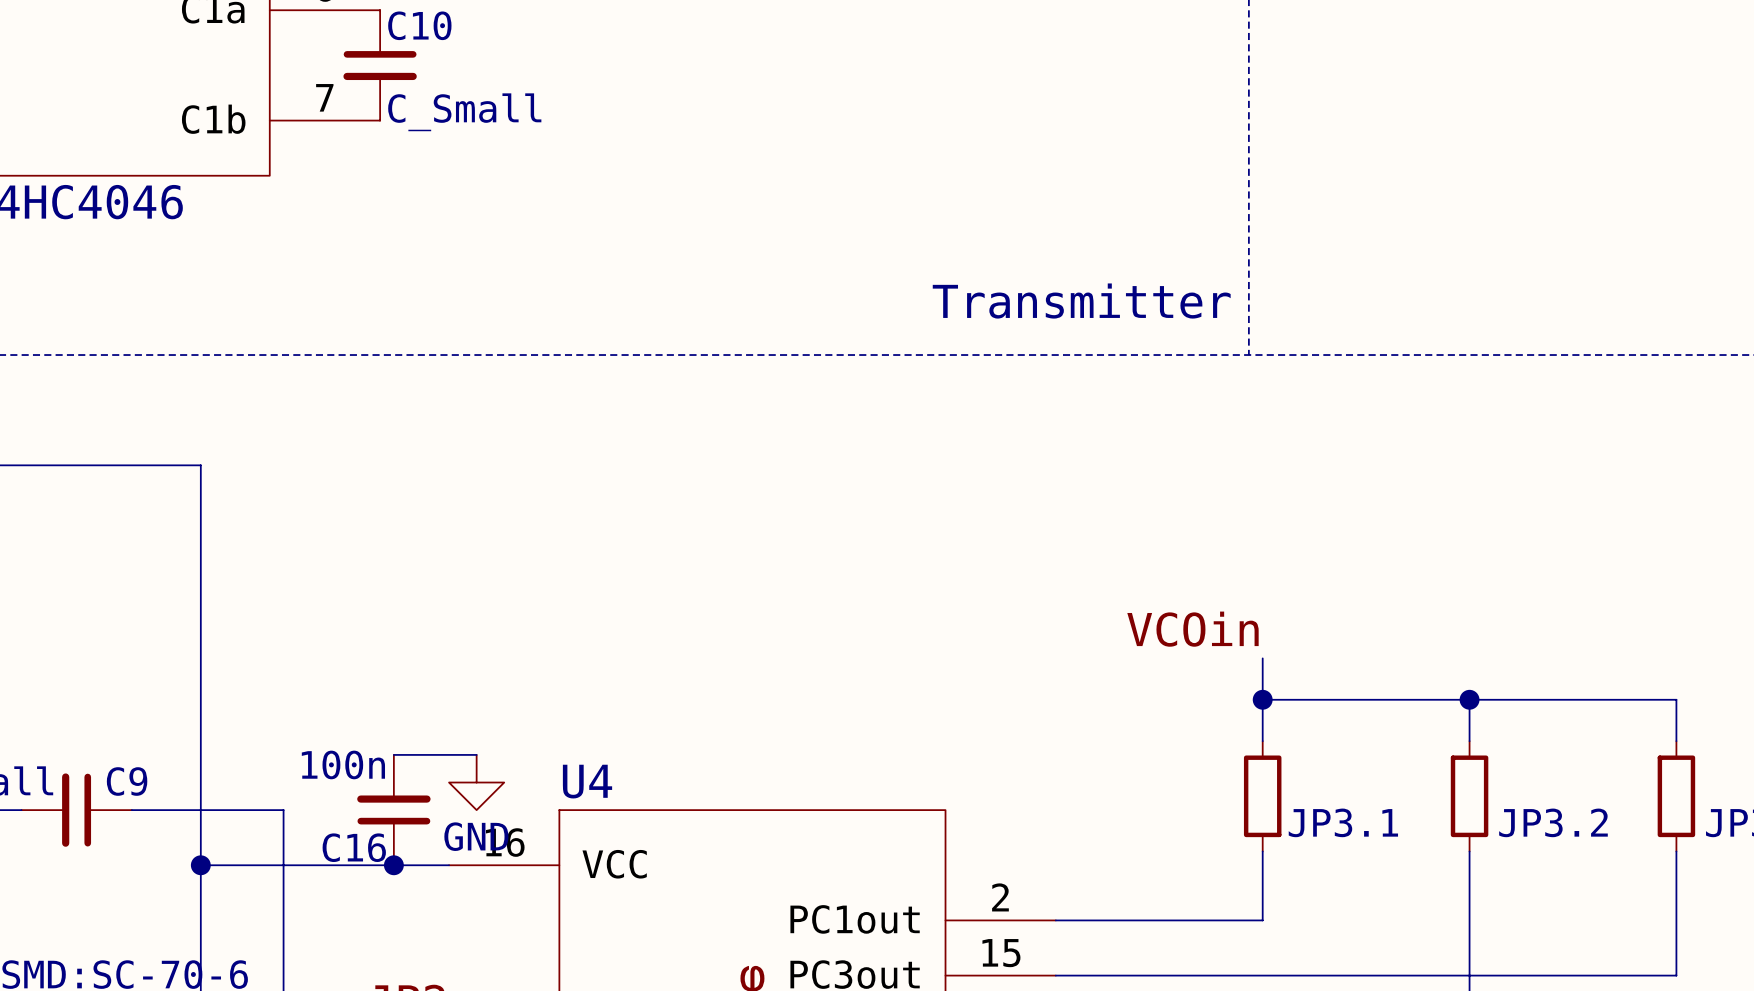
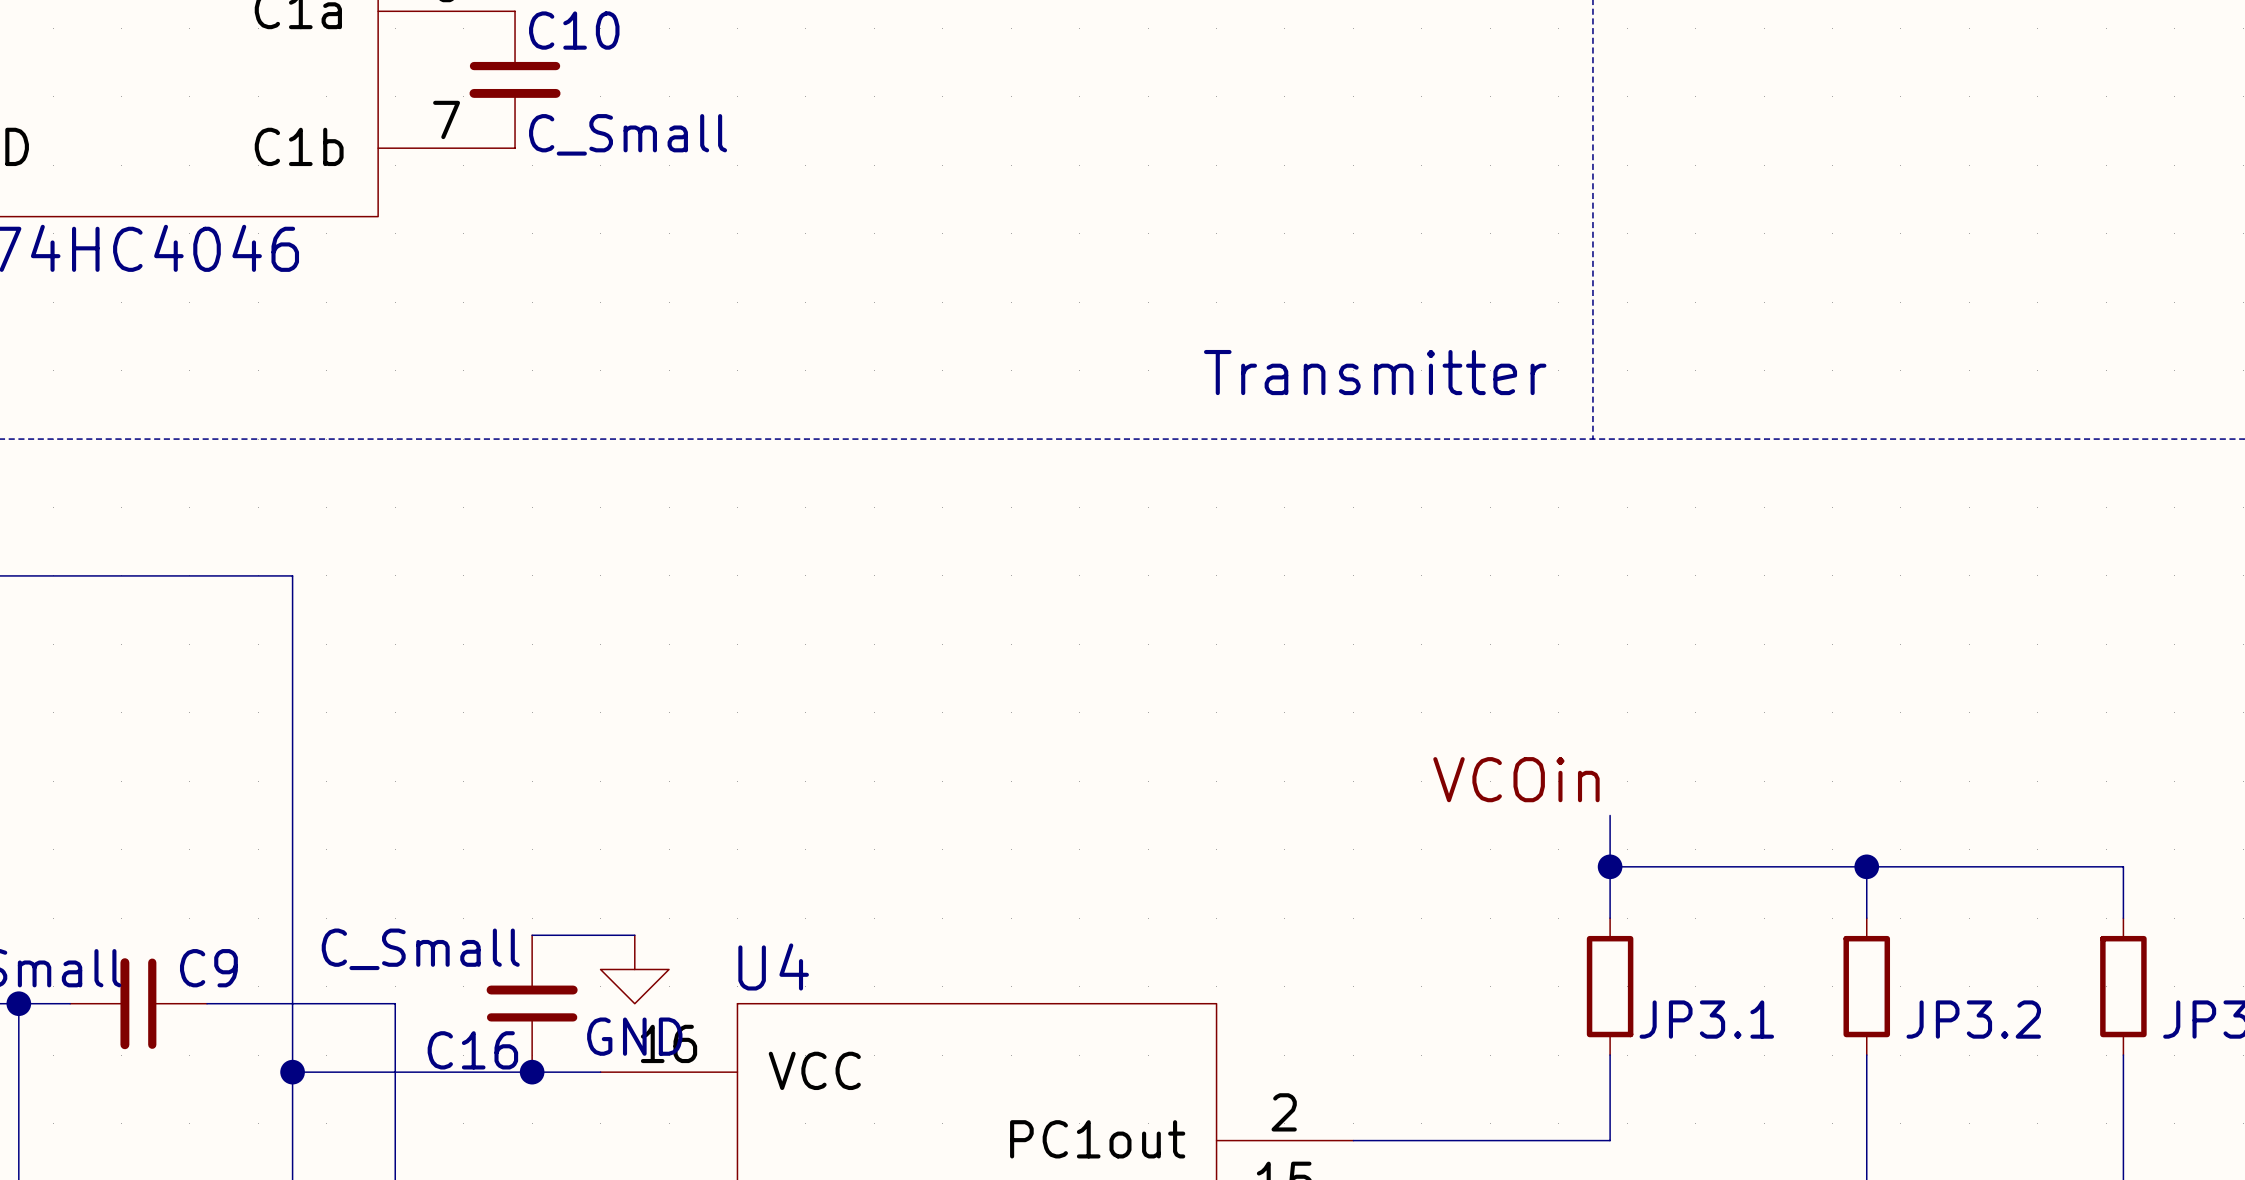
C16 value: 100n (343, 764) -> C_Small (420, 949)

